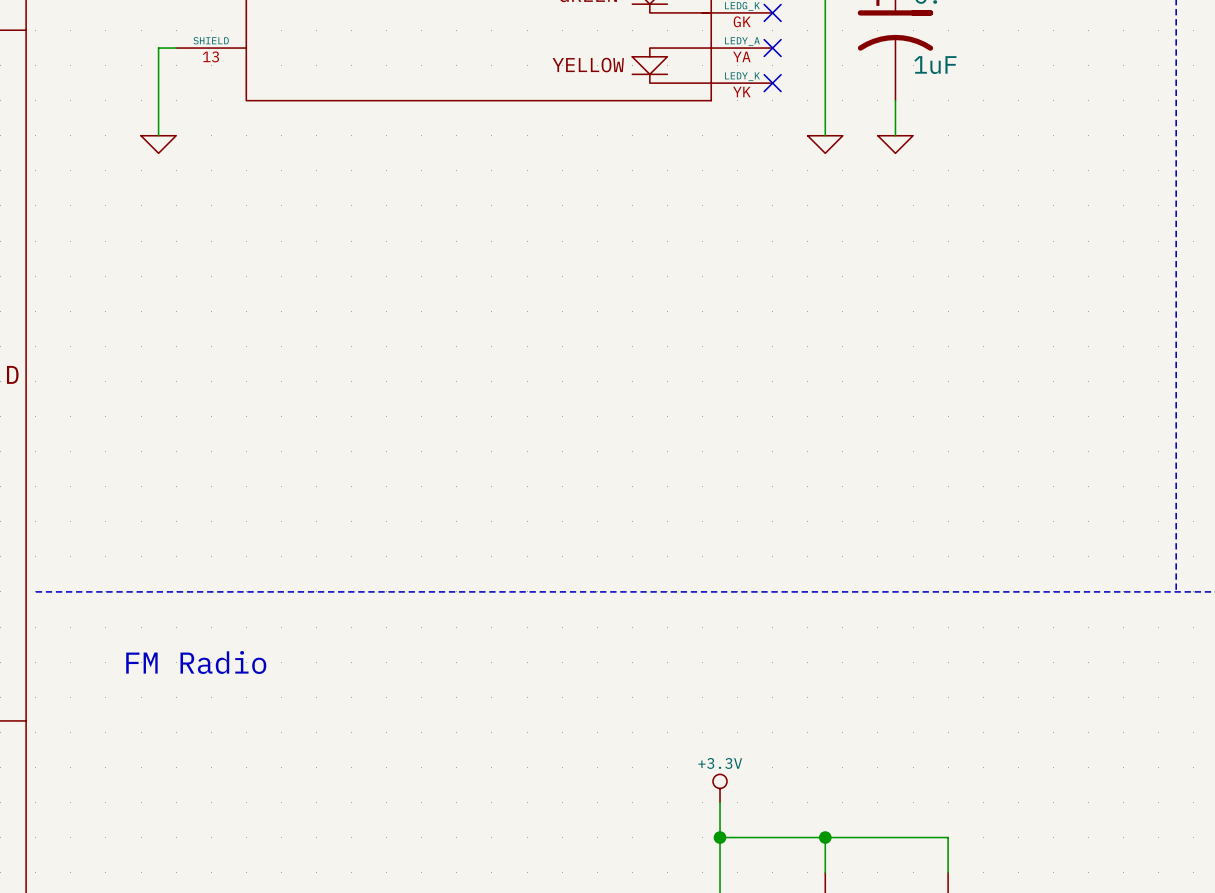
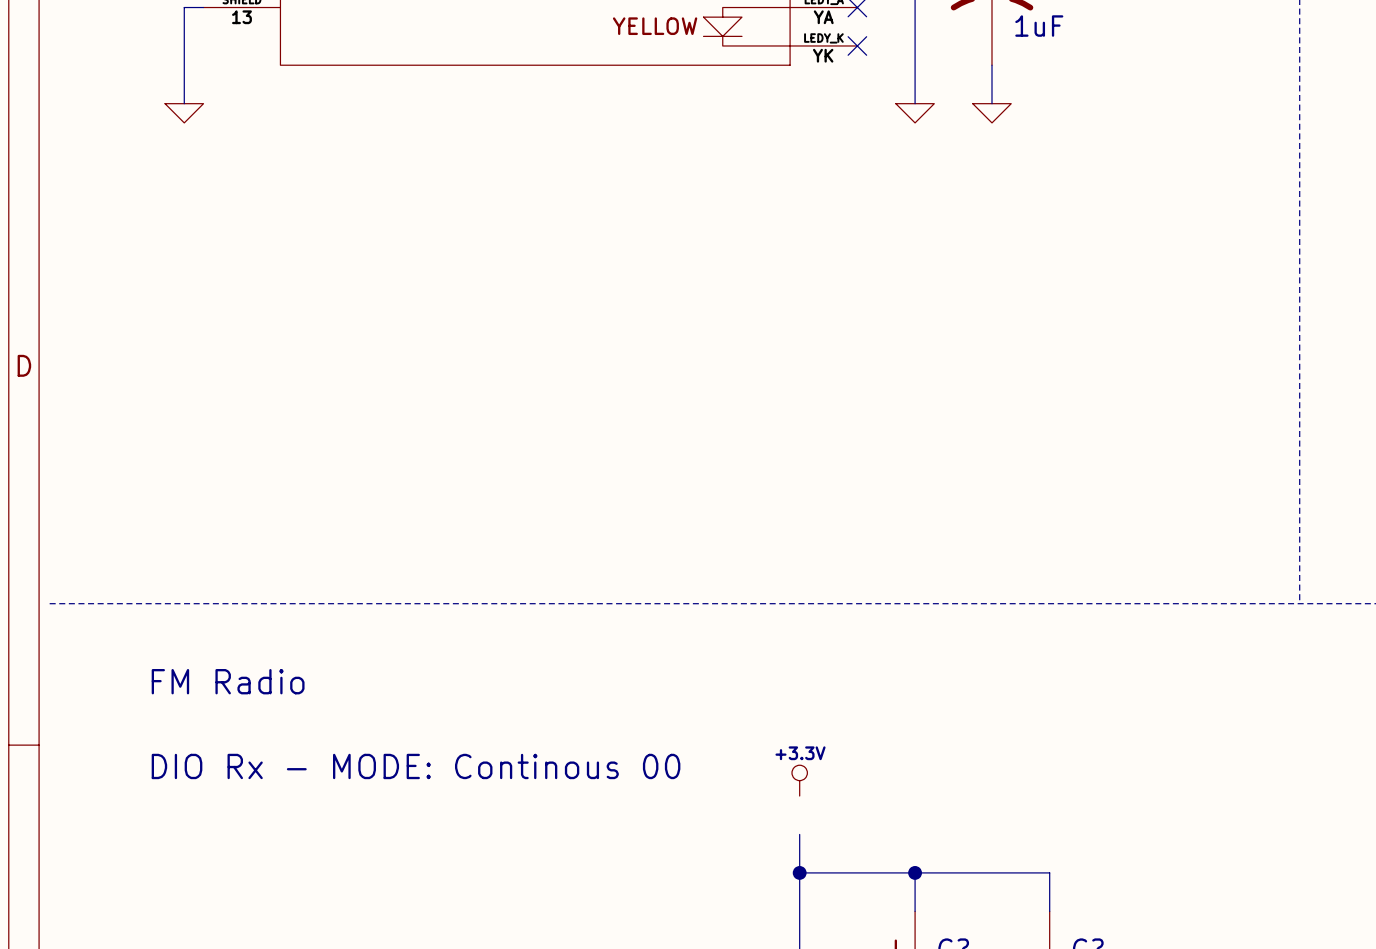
text: none -> DIO Rx - MODE: Continous 00 (416, 766)
power symbol position: +3.3V (720, 788) -> +3.3V (799, 780)

